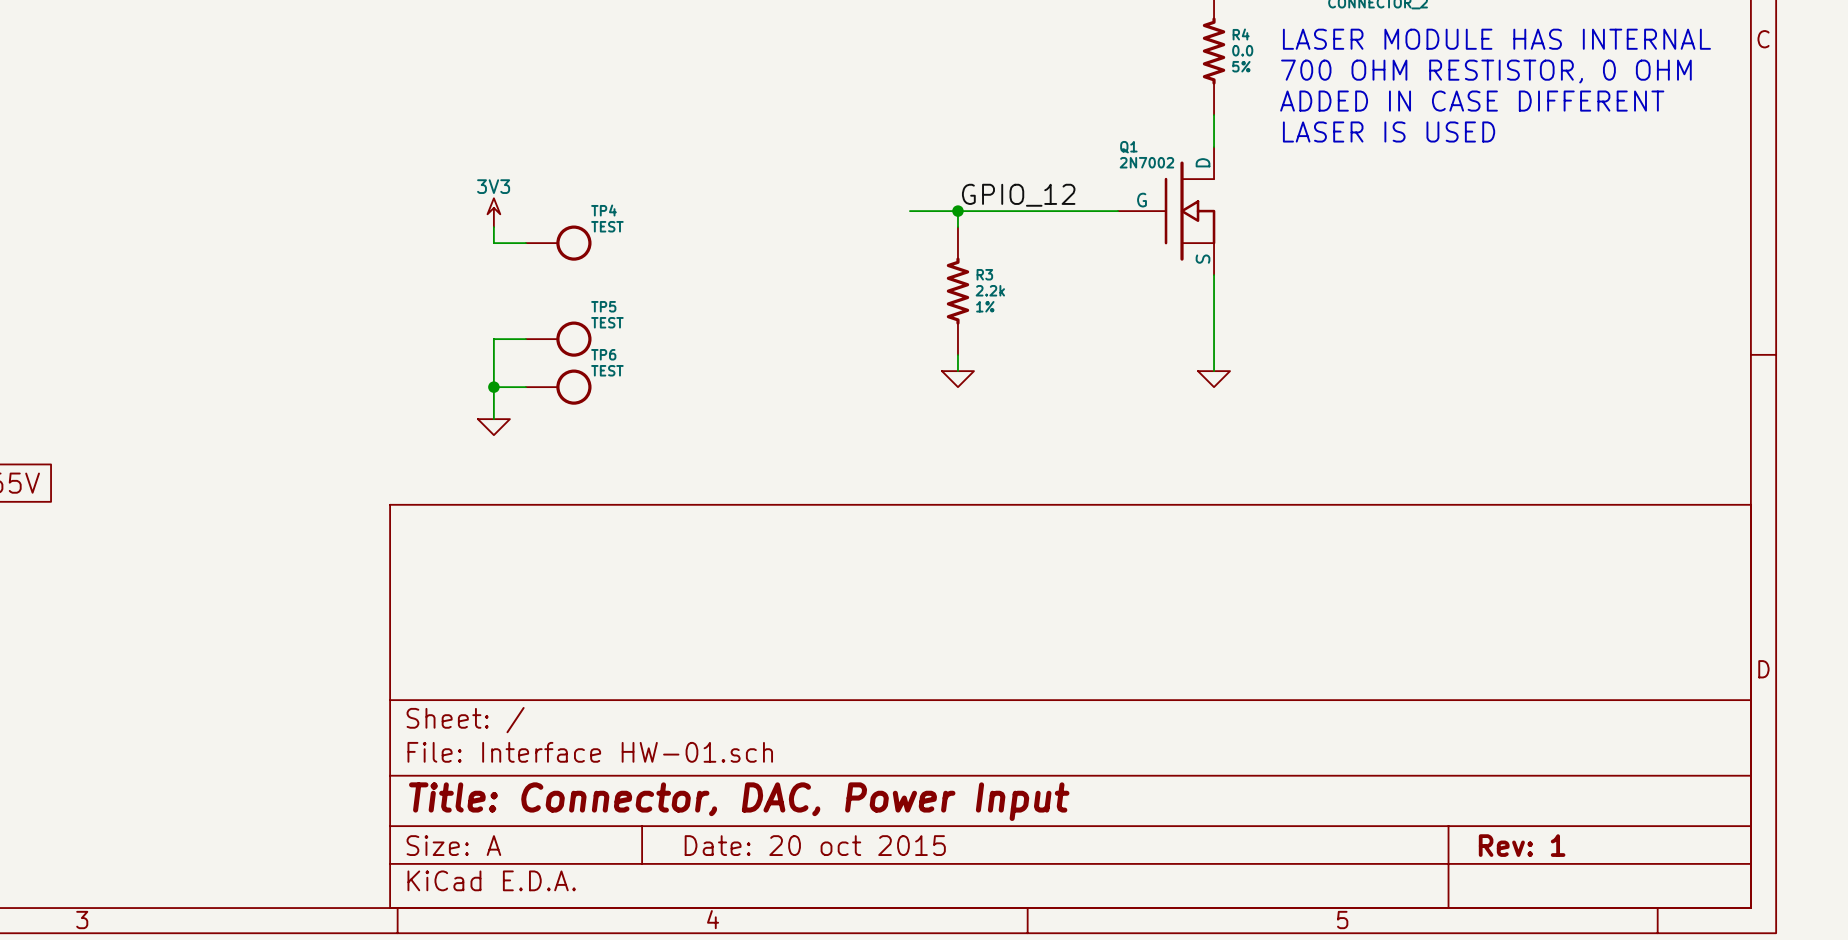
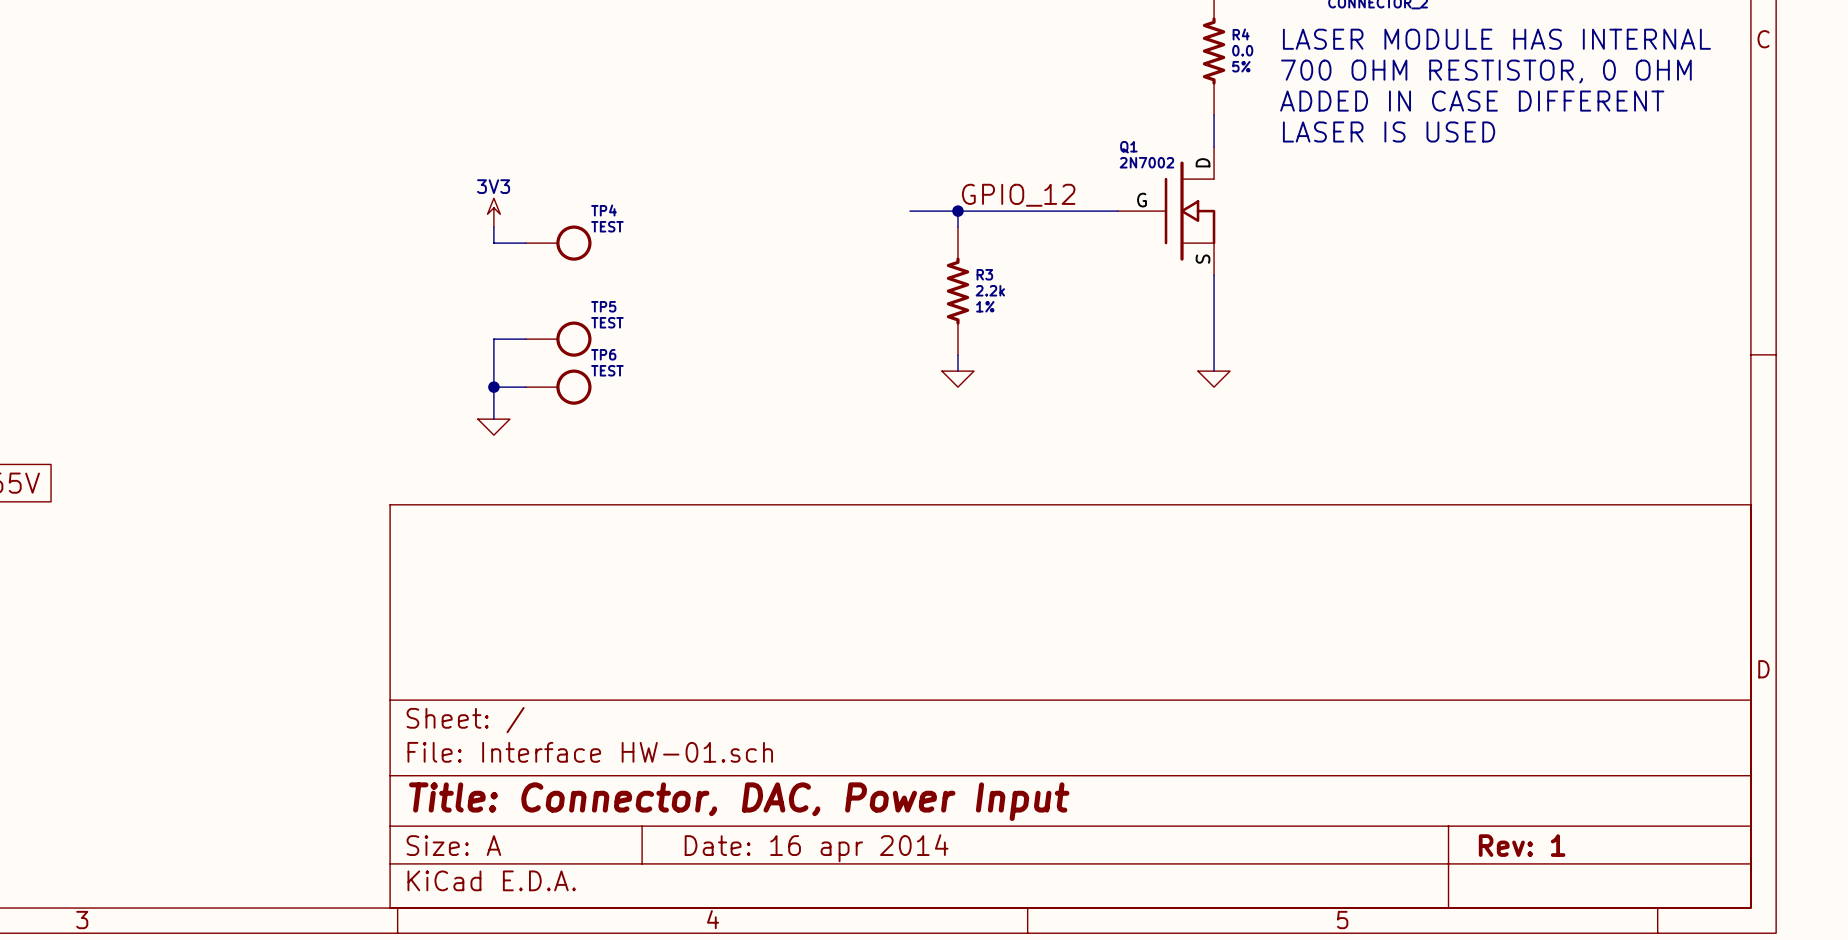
title block: Date: 20 oct 2015 (815, 845) -> Date: 16 apr 2014 (816, 848)

